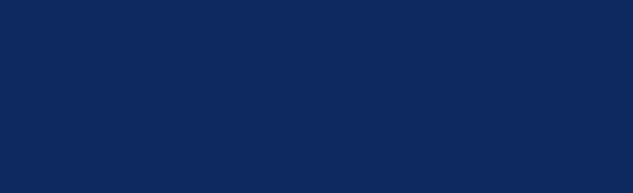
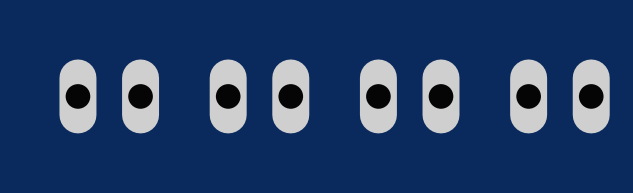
part: none -> (109, 96)
part: none -> (259, 96)
part: none -> (409, 96)
part: none -> (559, 96)

